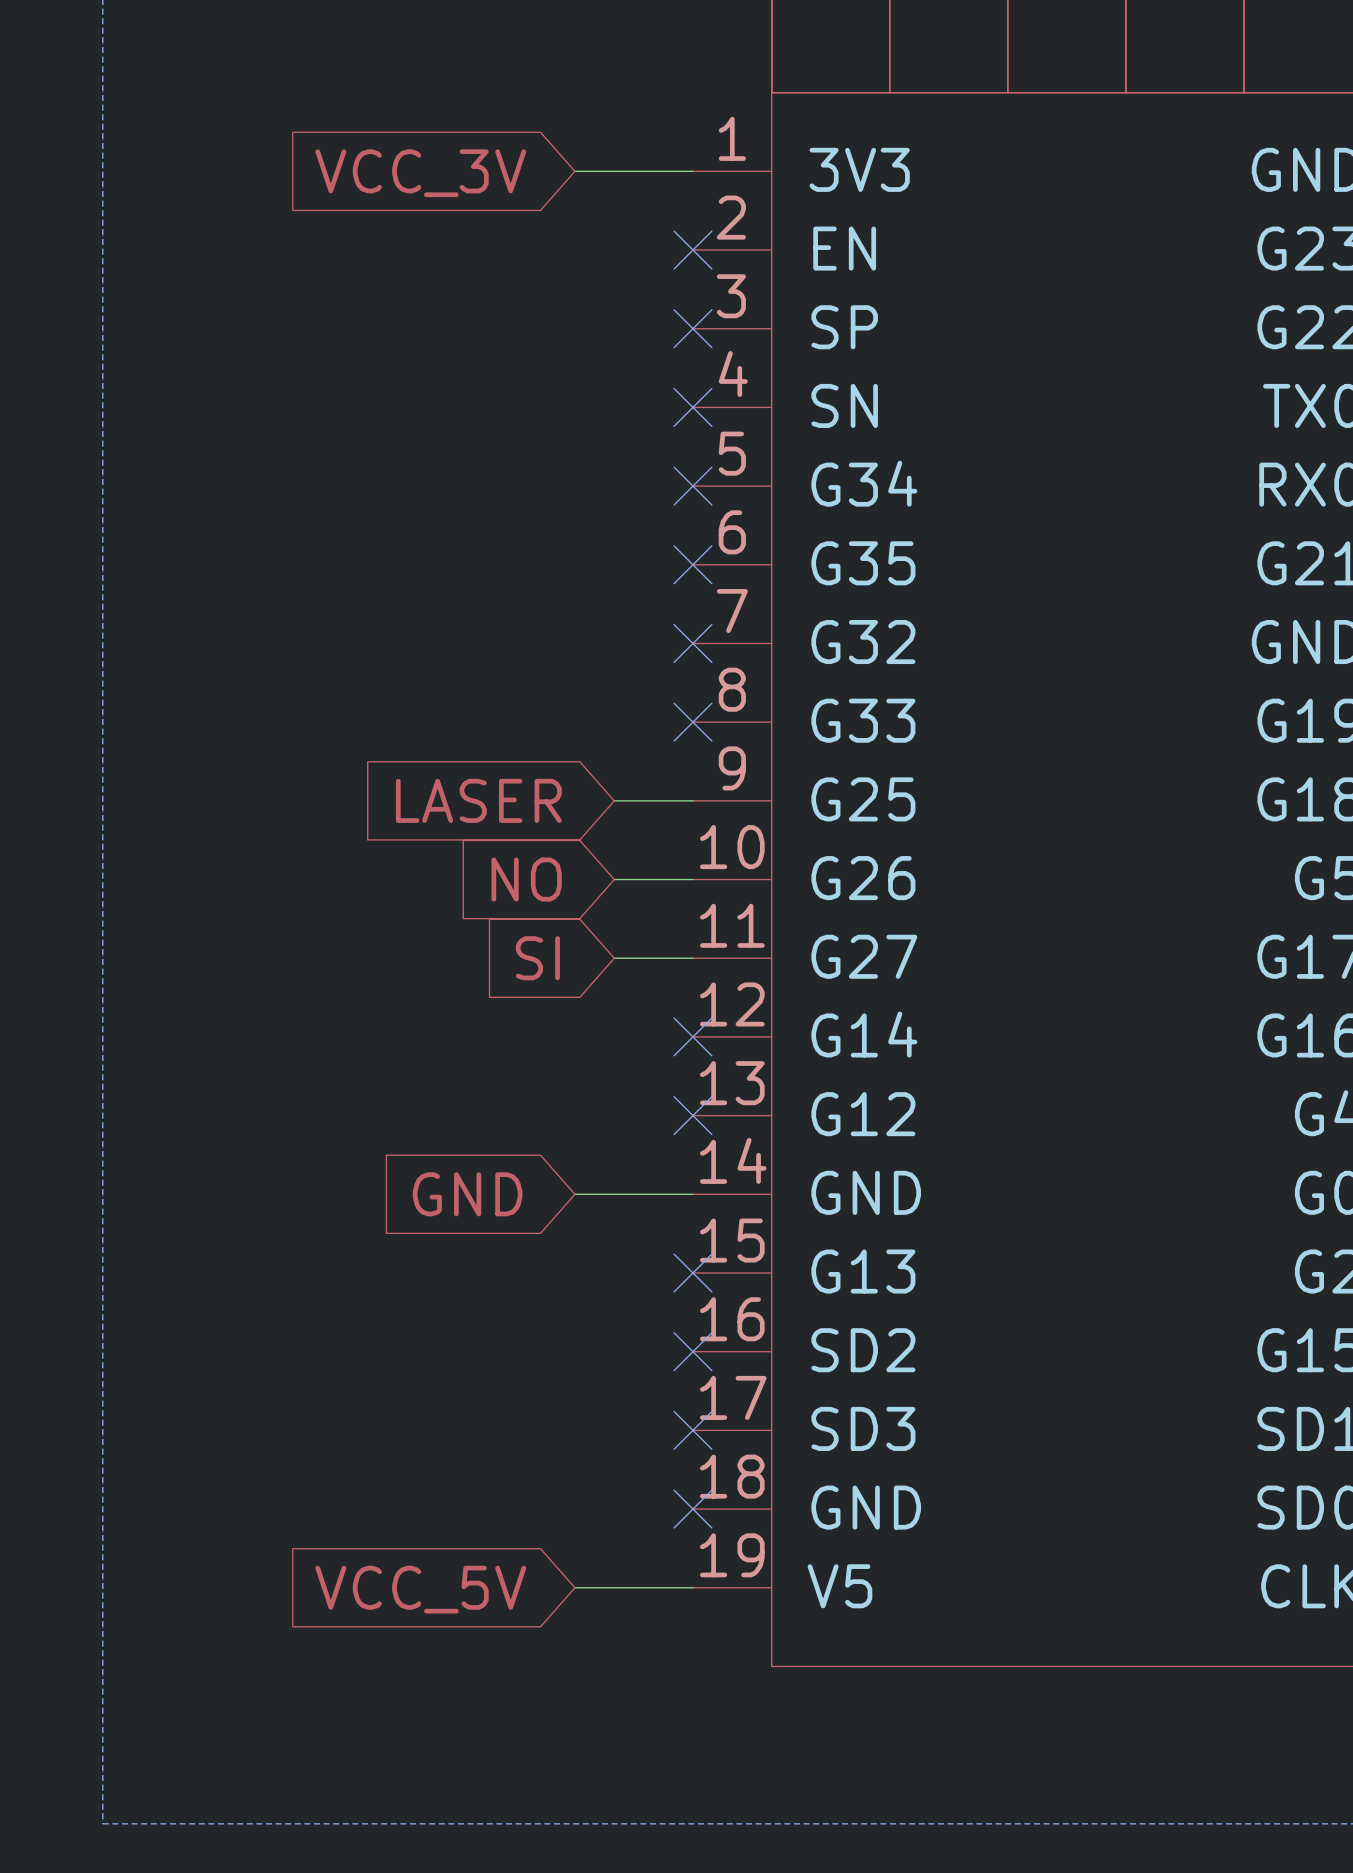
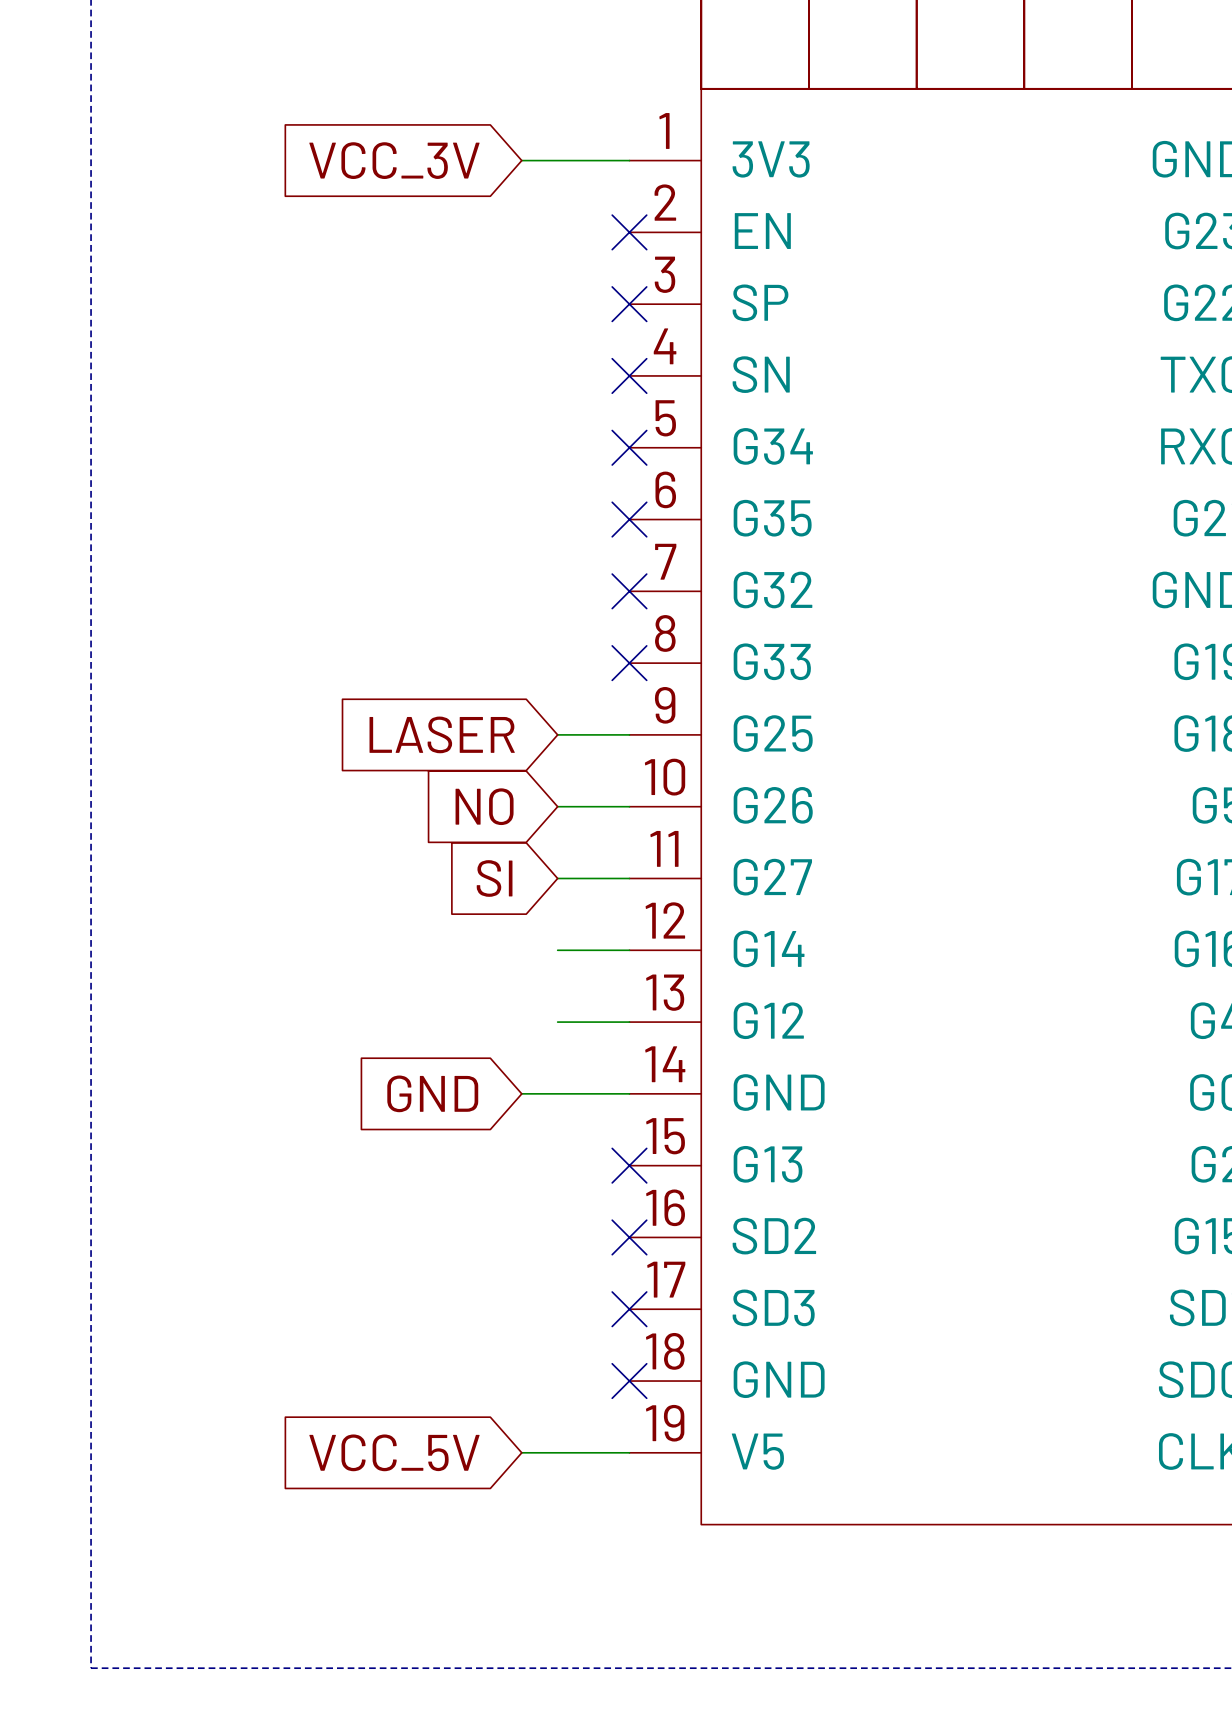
wire: none -> (557, 950) (629, 950)
no-connect mark: (692, 1036) -> none
wire: none -> (557, 1022) (629, 1022)
no-connect mark: (692, 1115) -> none

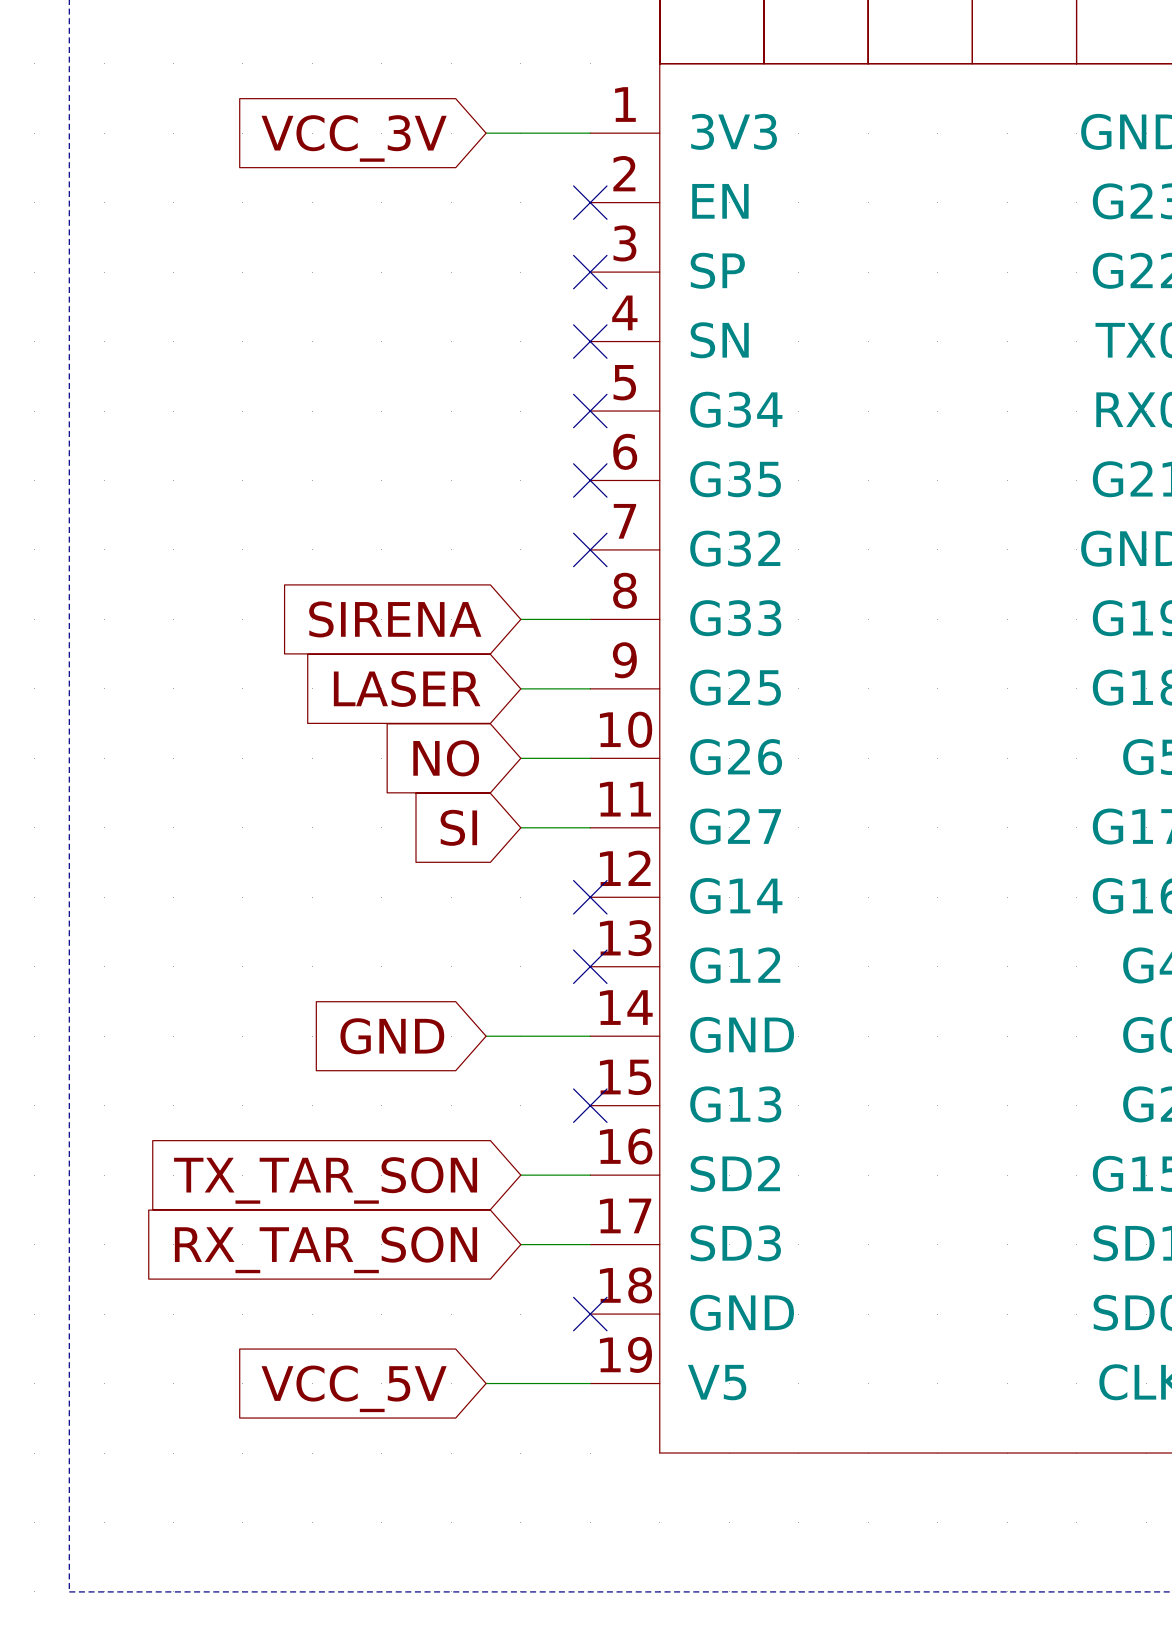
global label: none -> SIRENA (395, 619)
wire: none -> (520, 619) (590, 619)
no-connect mark: (629, 663) -> none
wire: (557, 950) (629, 950) -> (520, 1175) (590, 1175)
no-connect mark: none -> (590, 897)
wire: (557, 1022) (629, 1022) -> (520, 1244) (590, 1244)
no-connect mark: none -> (590, 966)
global label: none -> TX_TAR_SON (325, 1180)
no-connect mark: (629, 1237) -> none
global label: none -> RX_TAR_SON (325, 1249)
no-connect mark: (629, 1309) -> none

